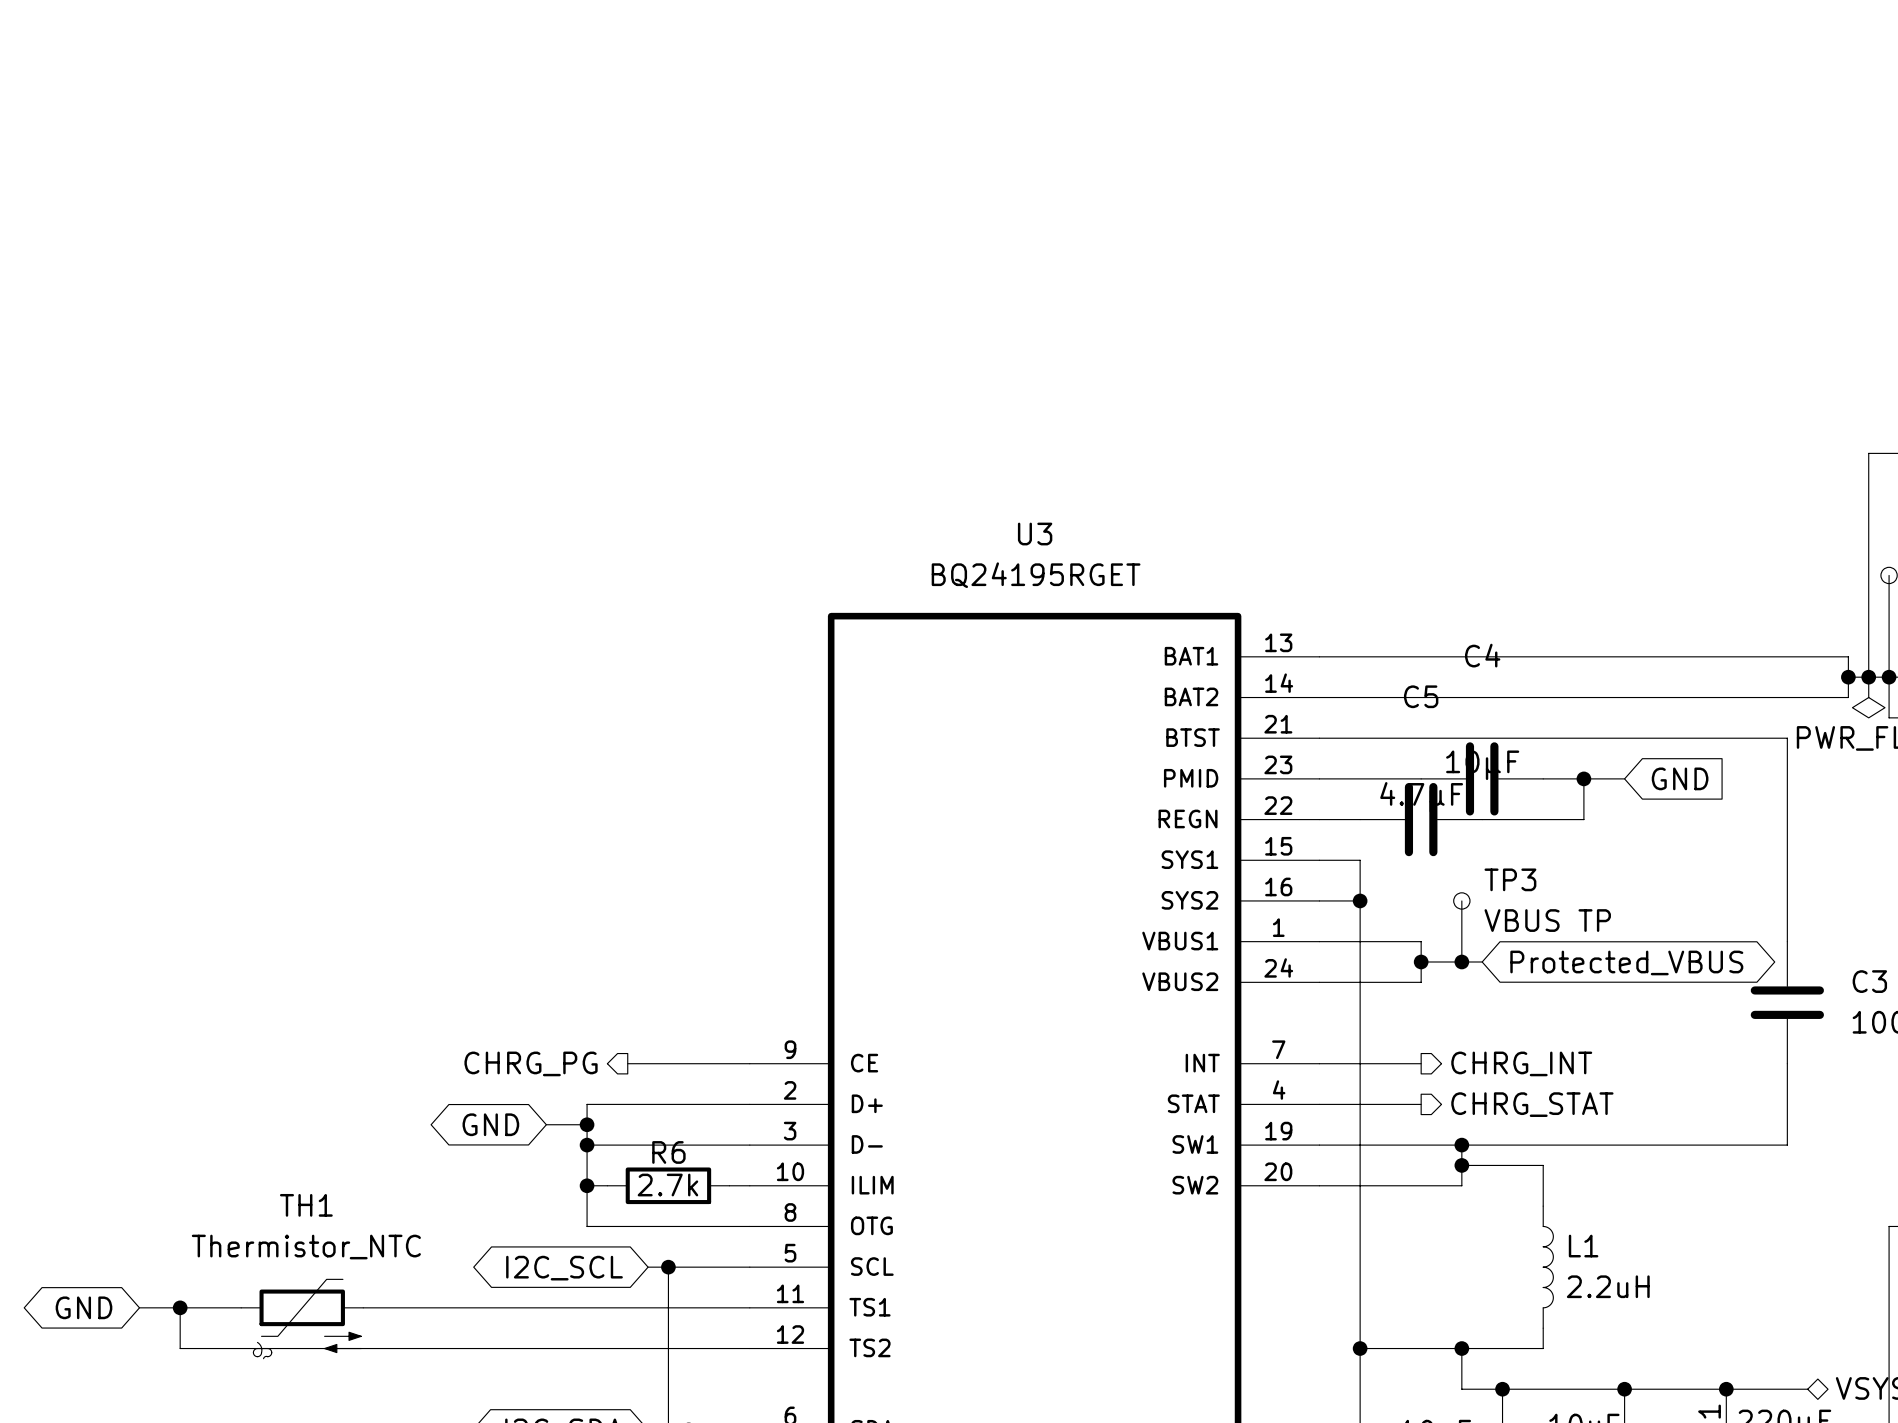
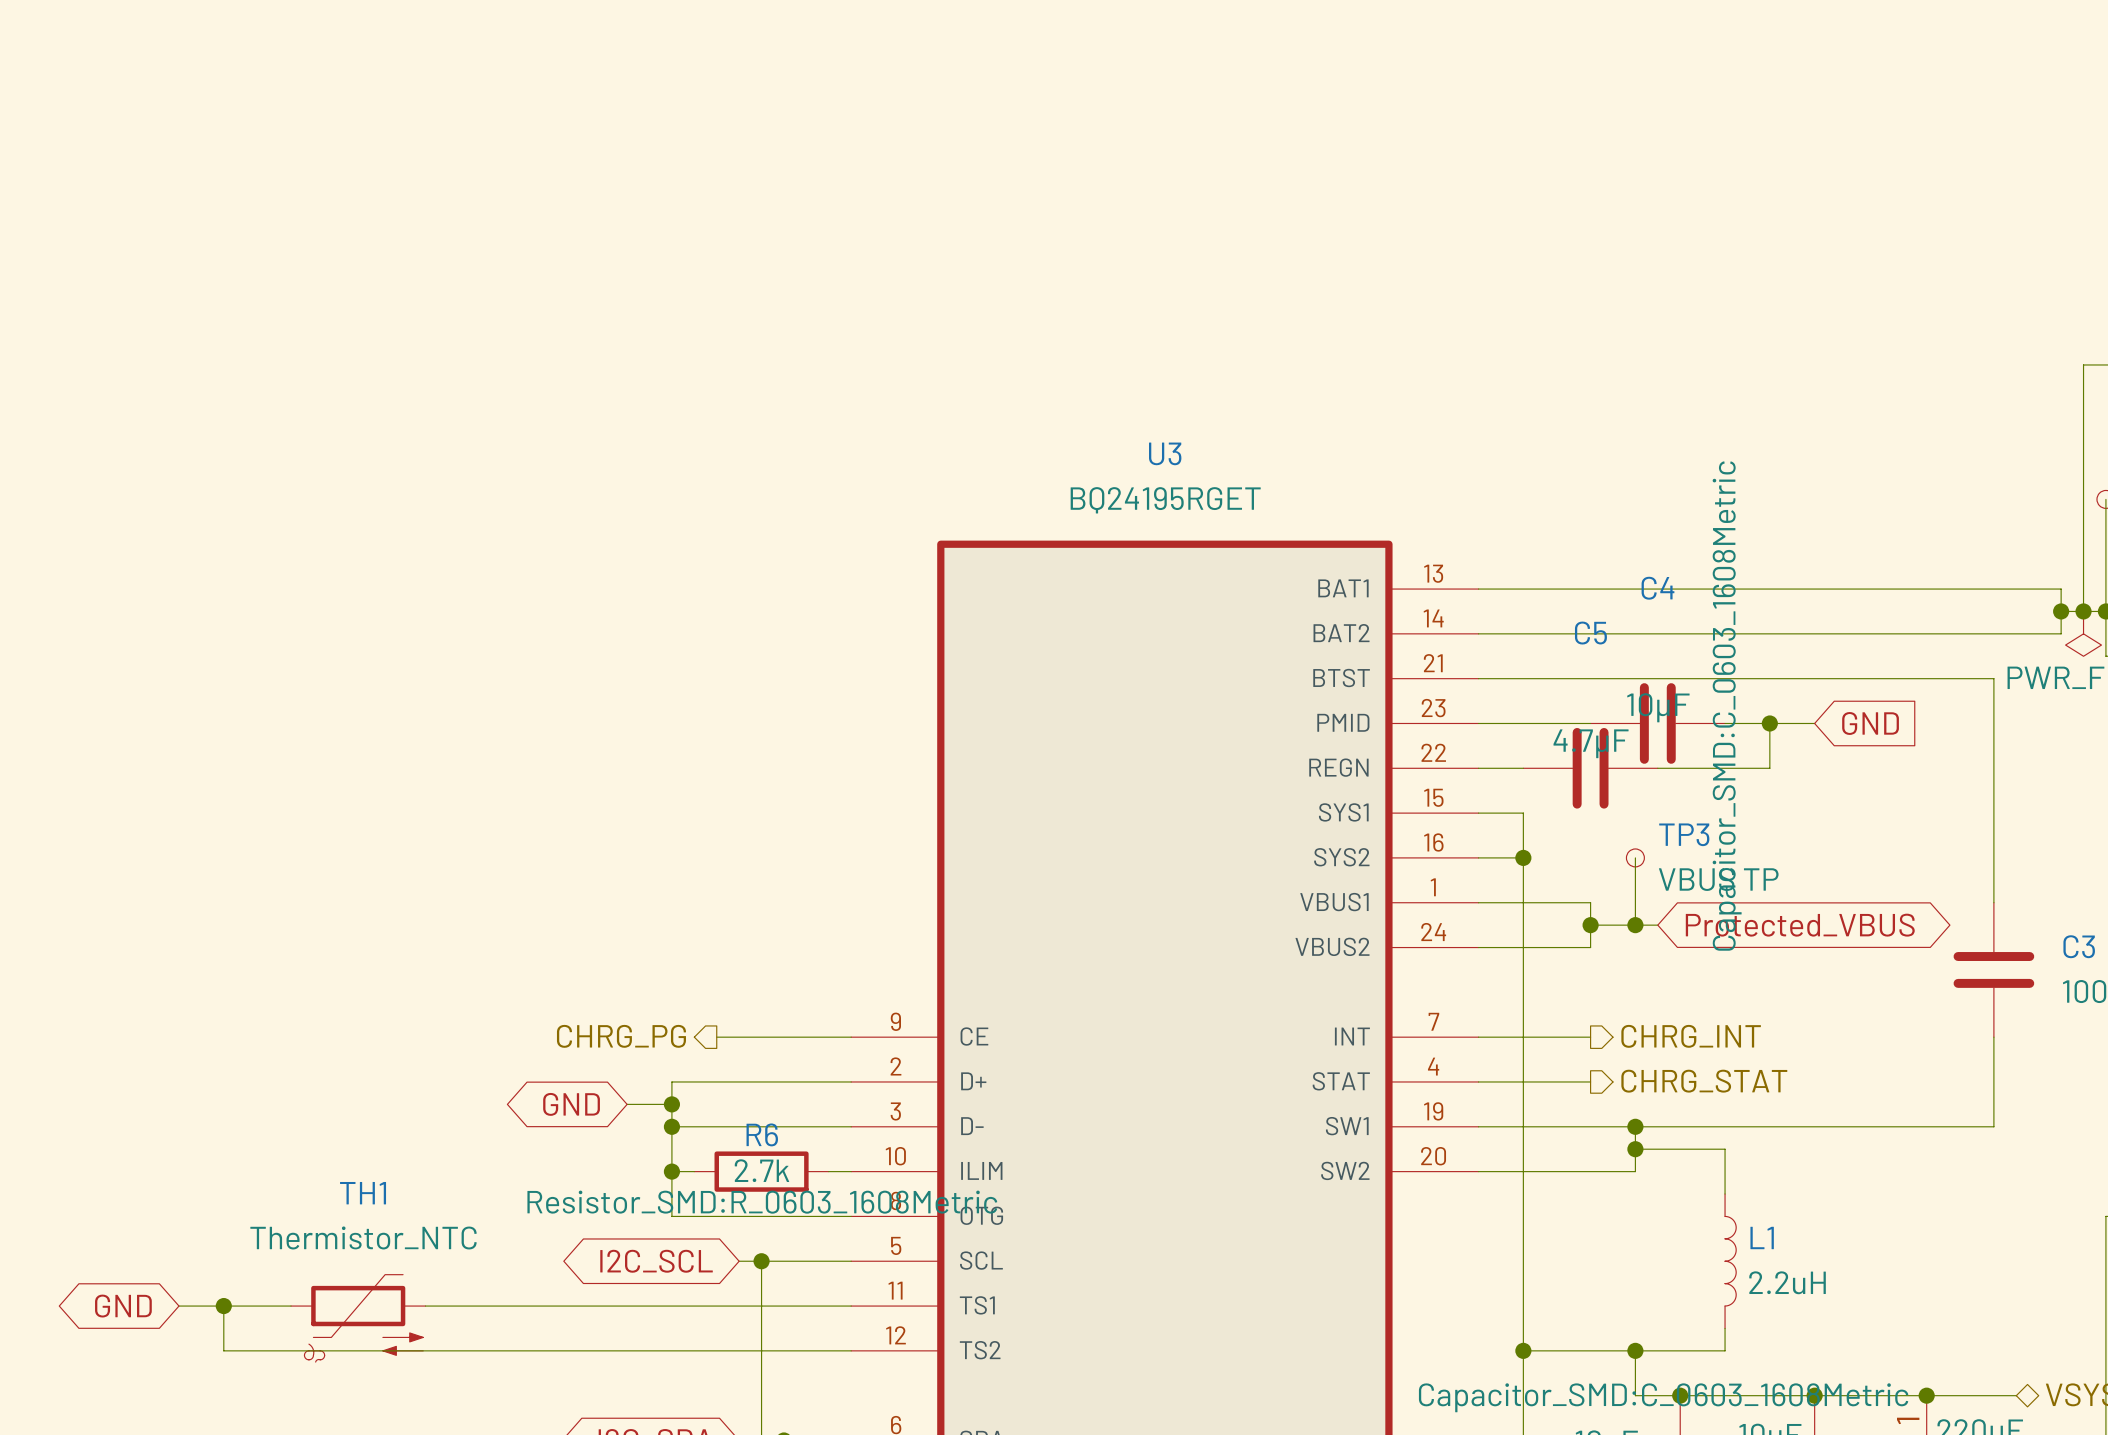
C4 text: none -> Capacitor_SMD:C_0603_1608Metric (1727, 706)
R6 text: none -> Resistor_SMD:R_0603_1608Metric (762, 1202)
part text: none -> Capacitor_SMD:C_0603_1608Metric (1663, 1397)

